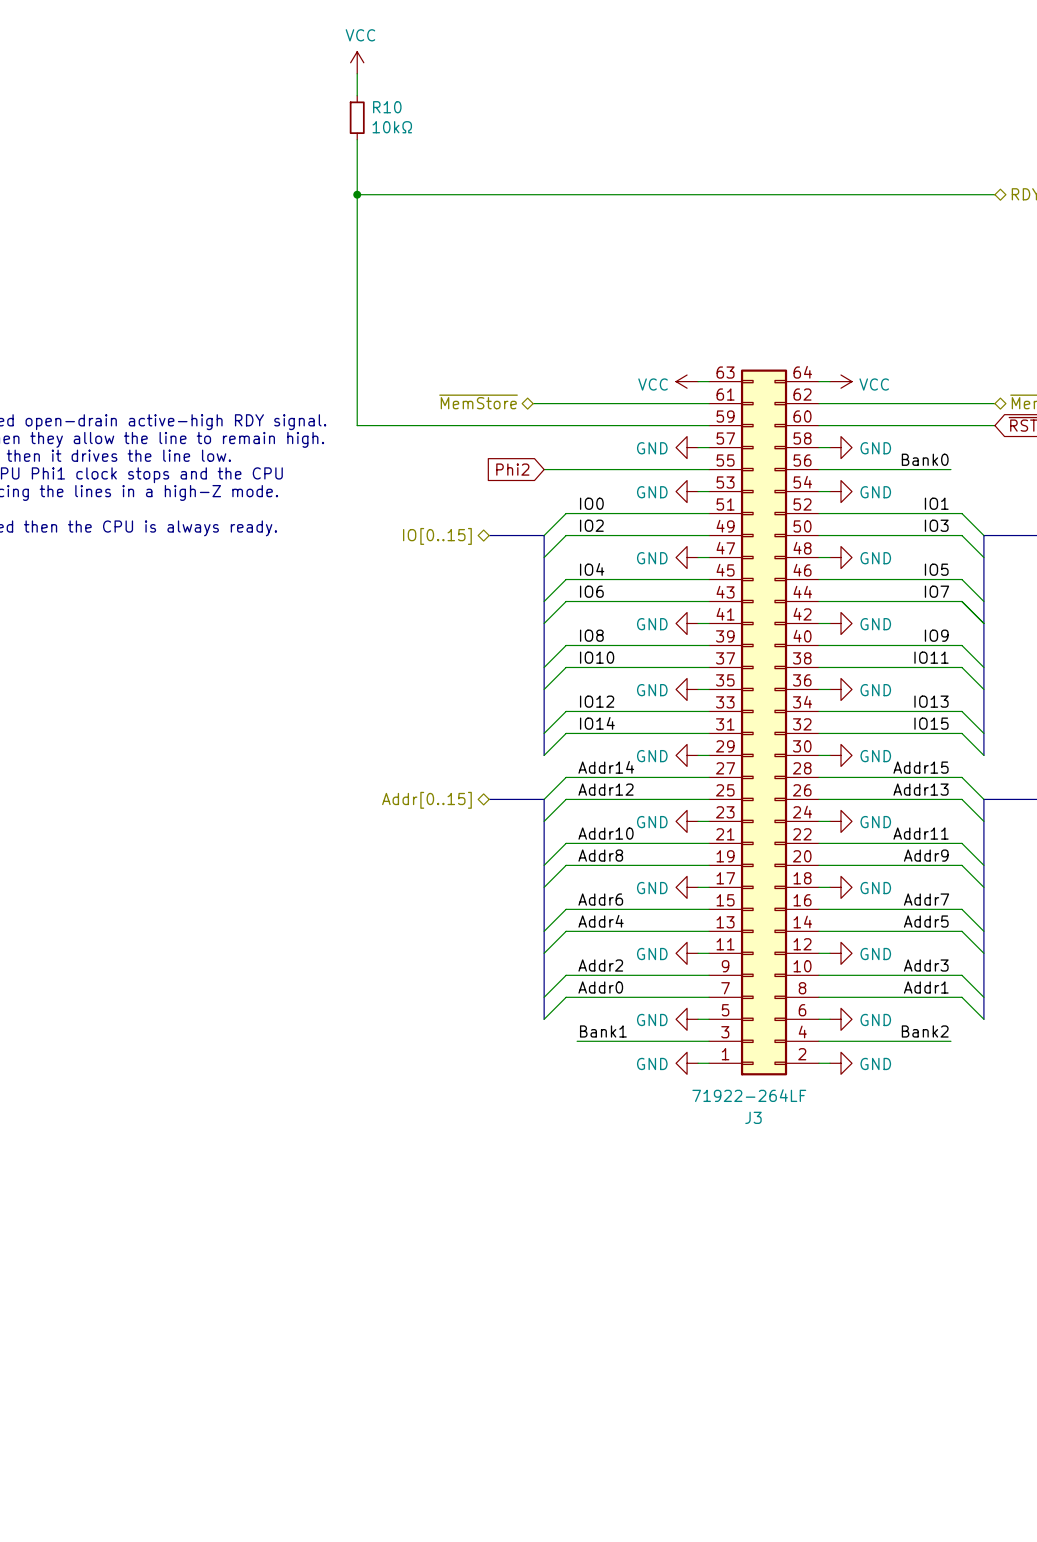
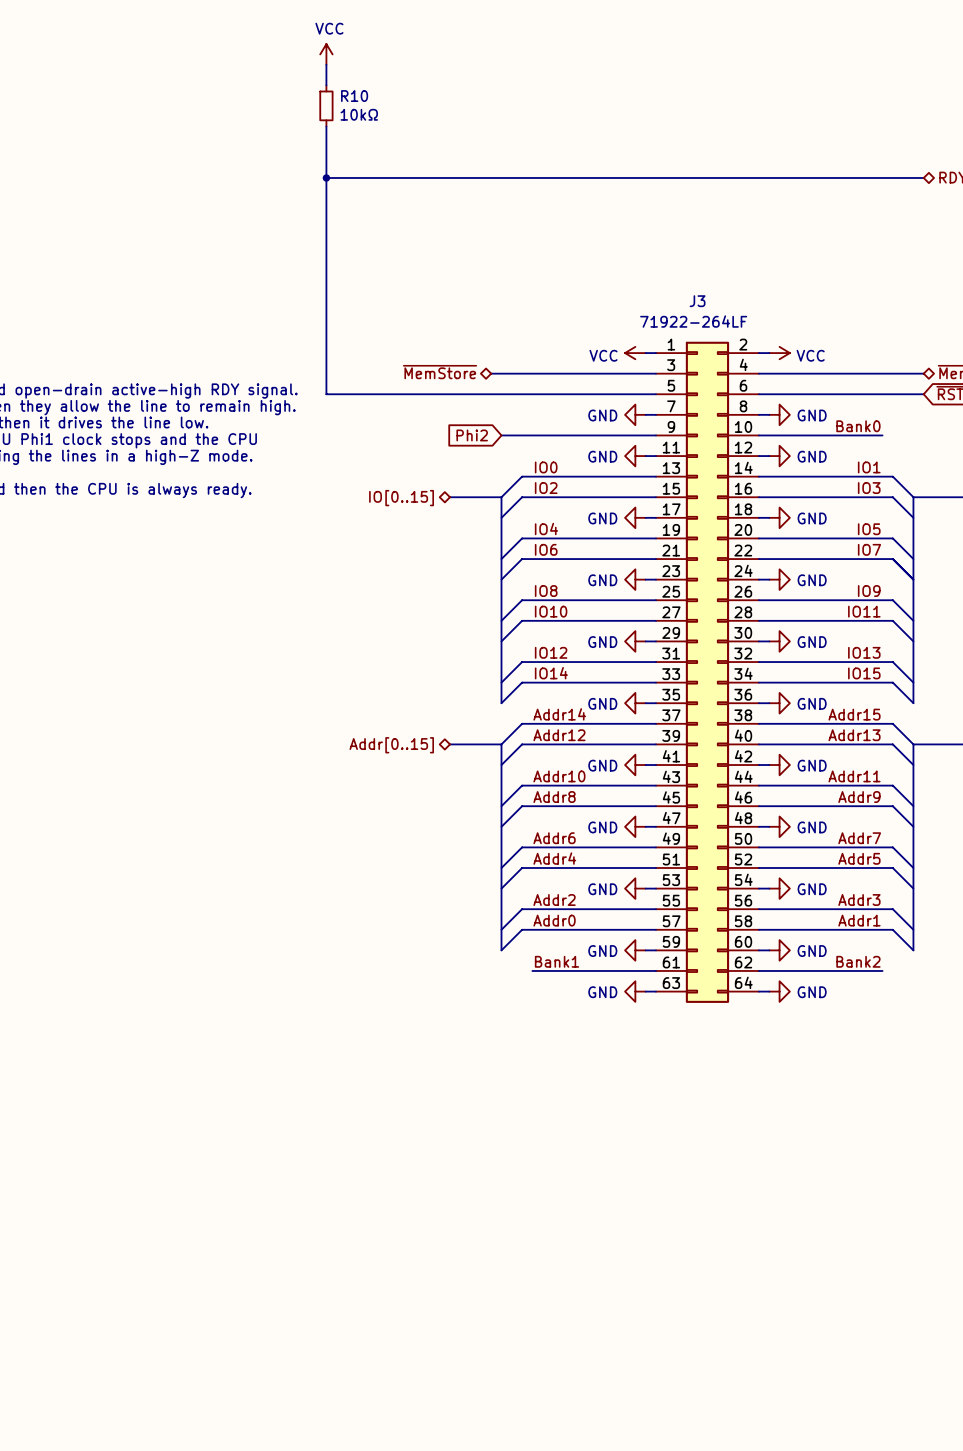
J3 flip: as is (764, 722) -> up-down (707, 672)

